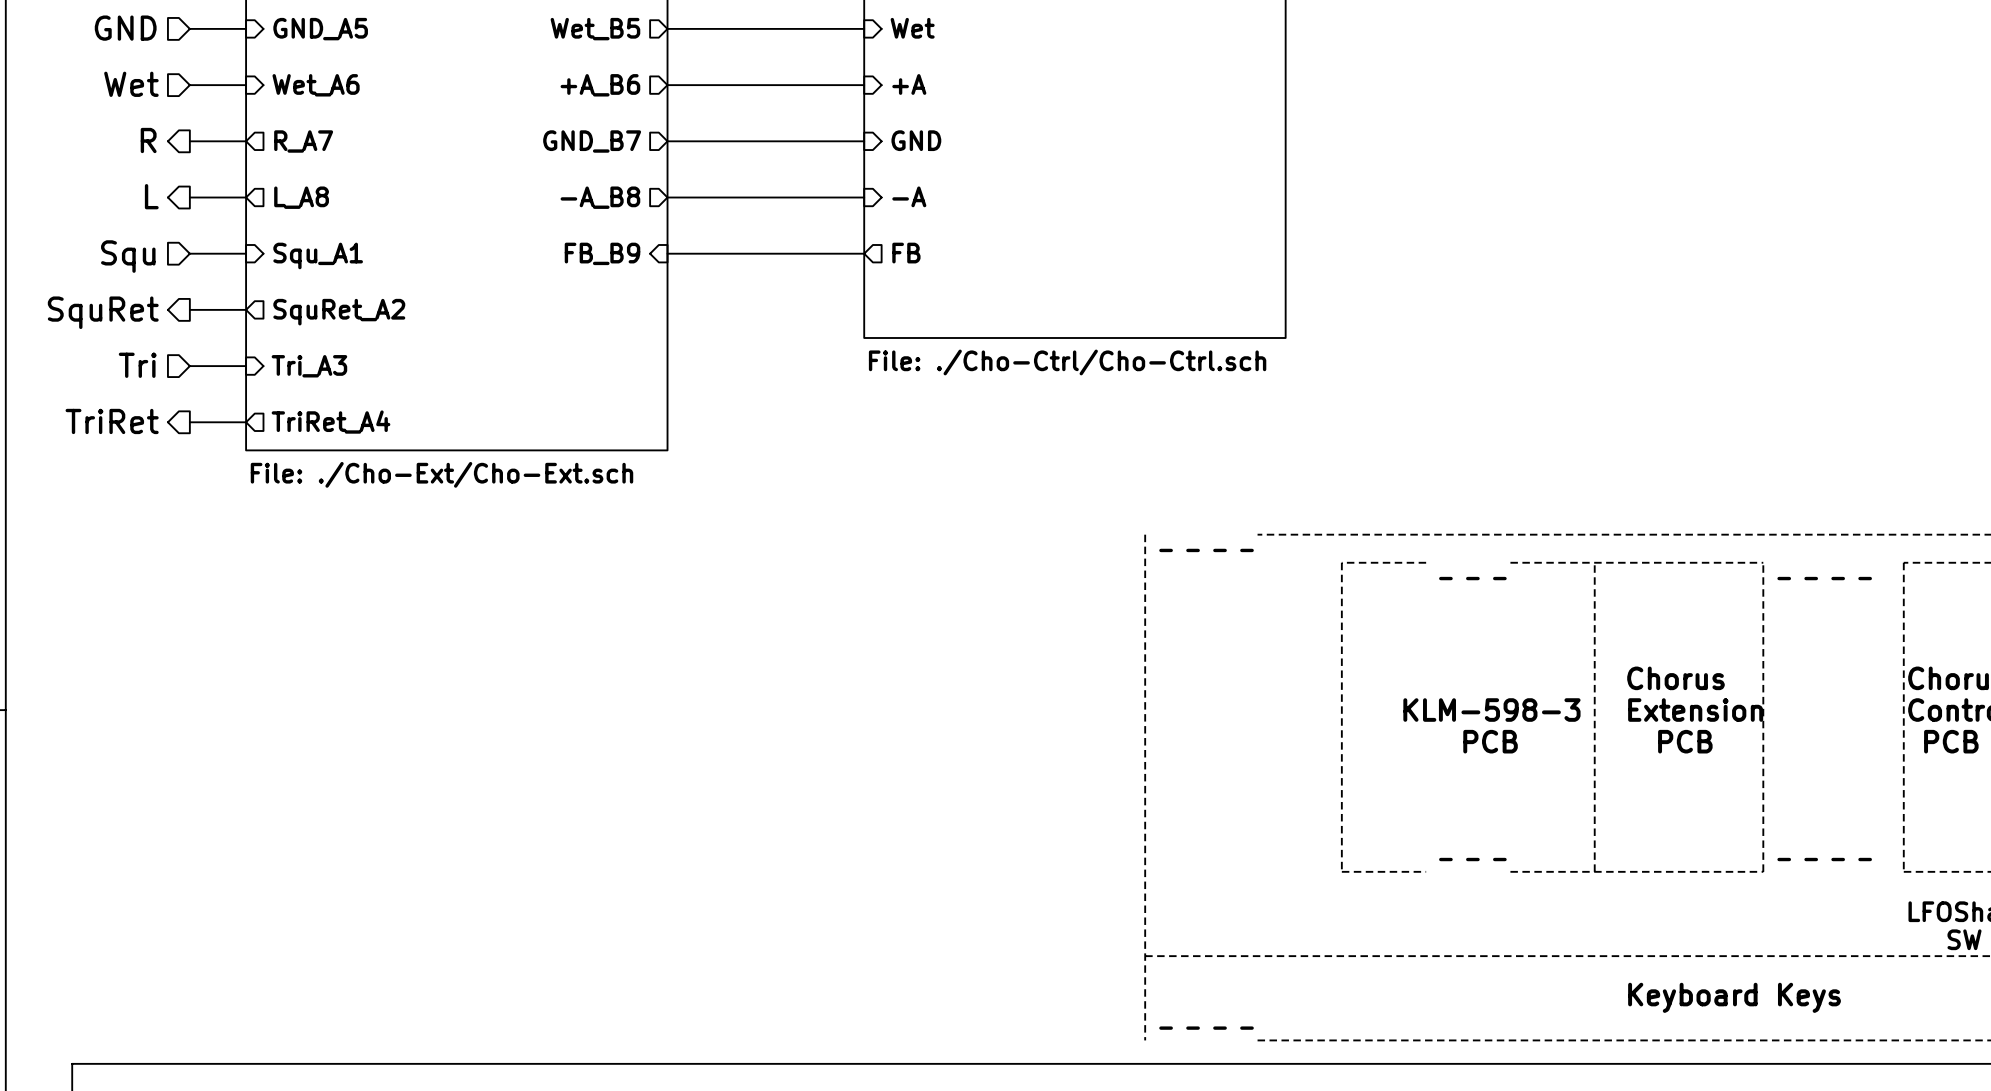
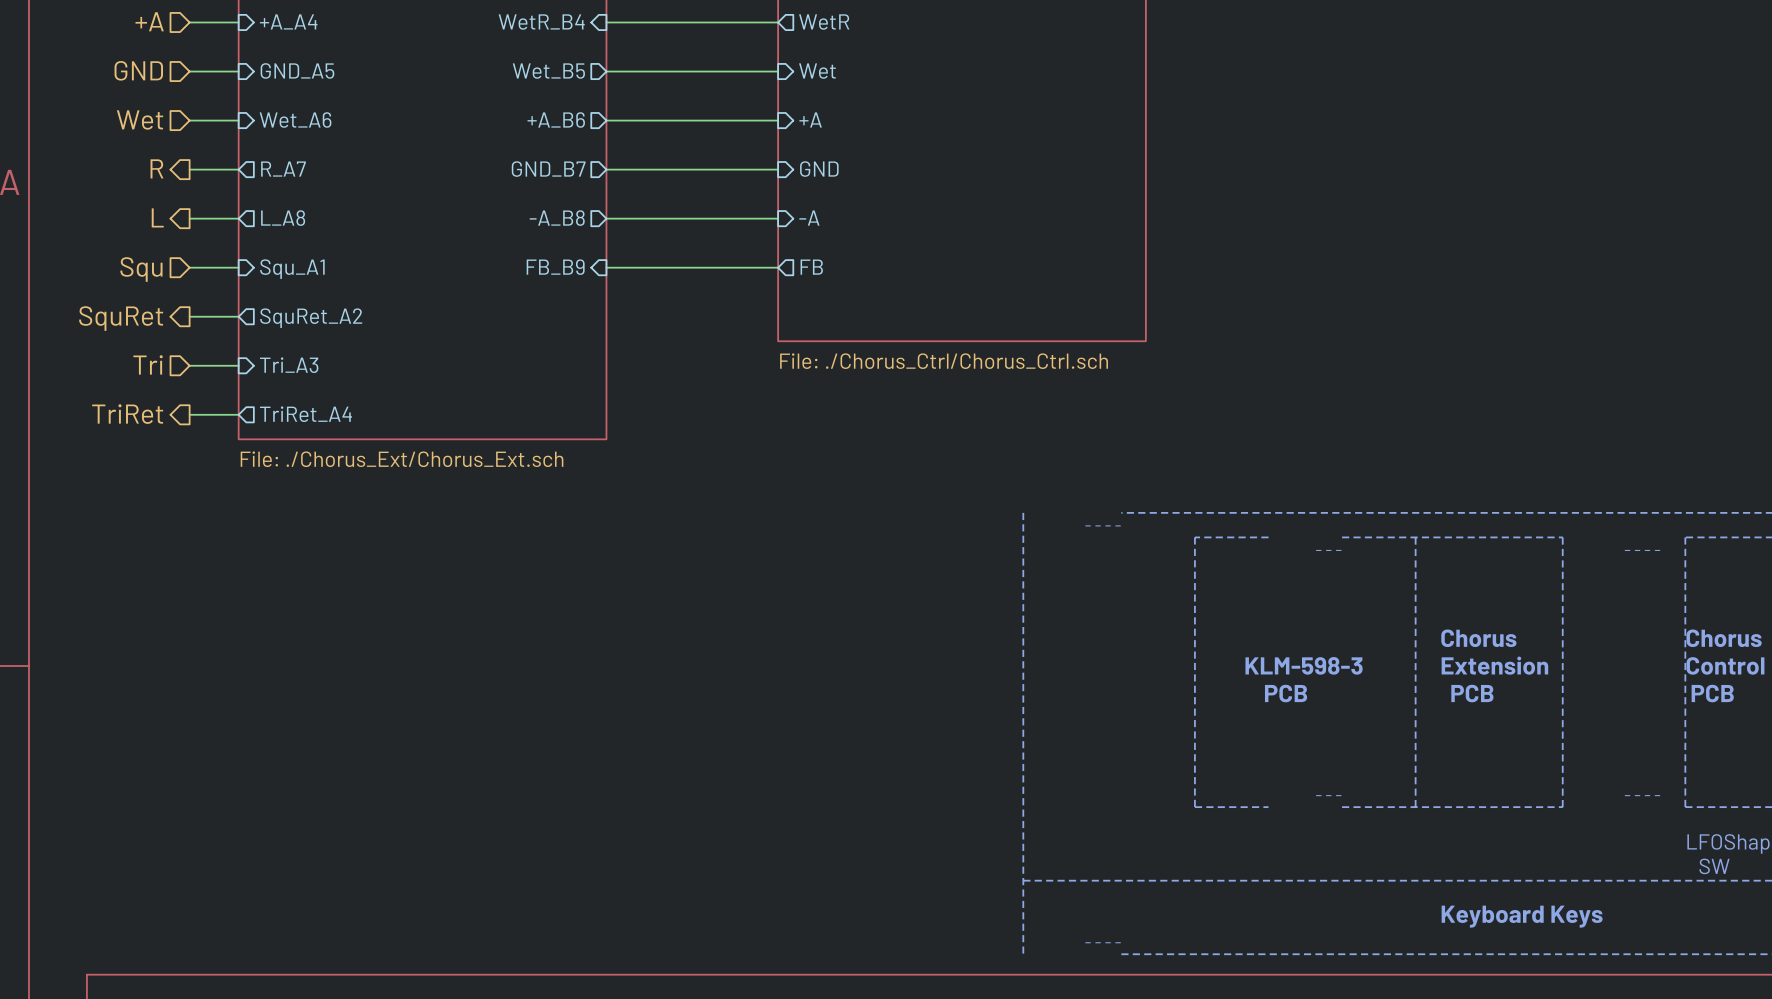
sheet value: File: ./Cho-Ctrl/Cho-Ctrl.sch (1067, 362) -> File: ./Chorus_Ctrl/Chorus_Ctrl.sch (944, 361)
sheet value: File: ./Cho-Ext/Cho-Ext.sch (441, 474) -> File: ./Chorus_Ext/Chorus_Ext.sch (402, 459)

